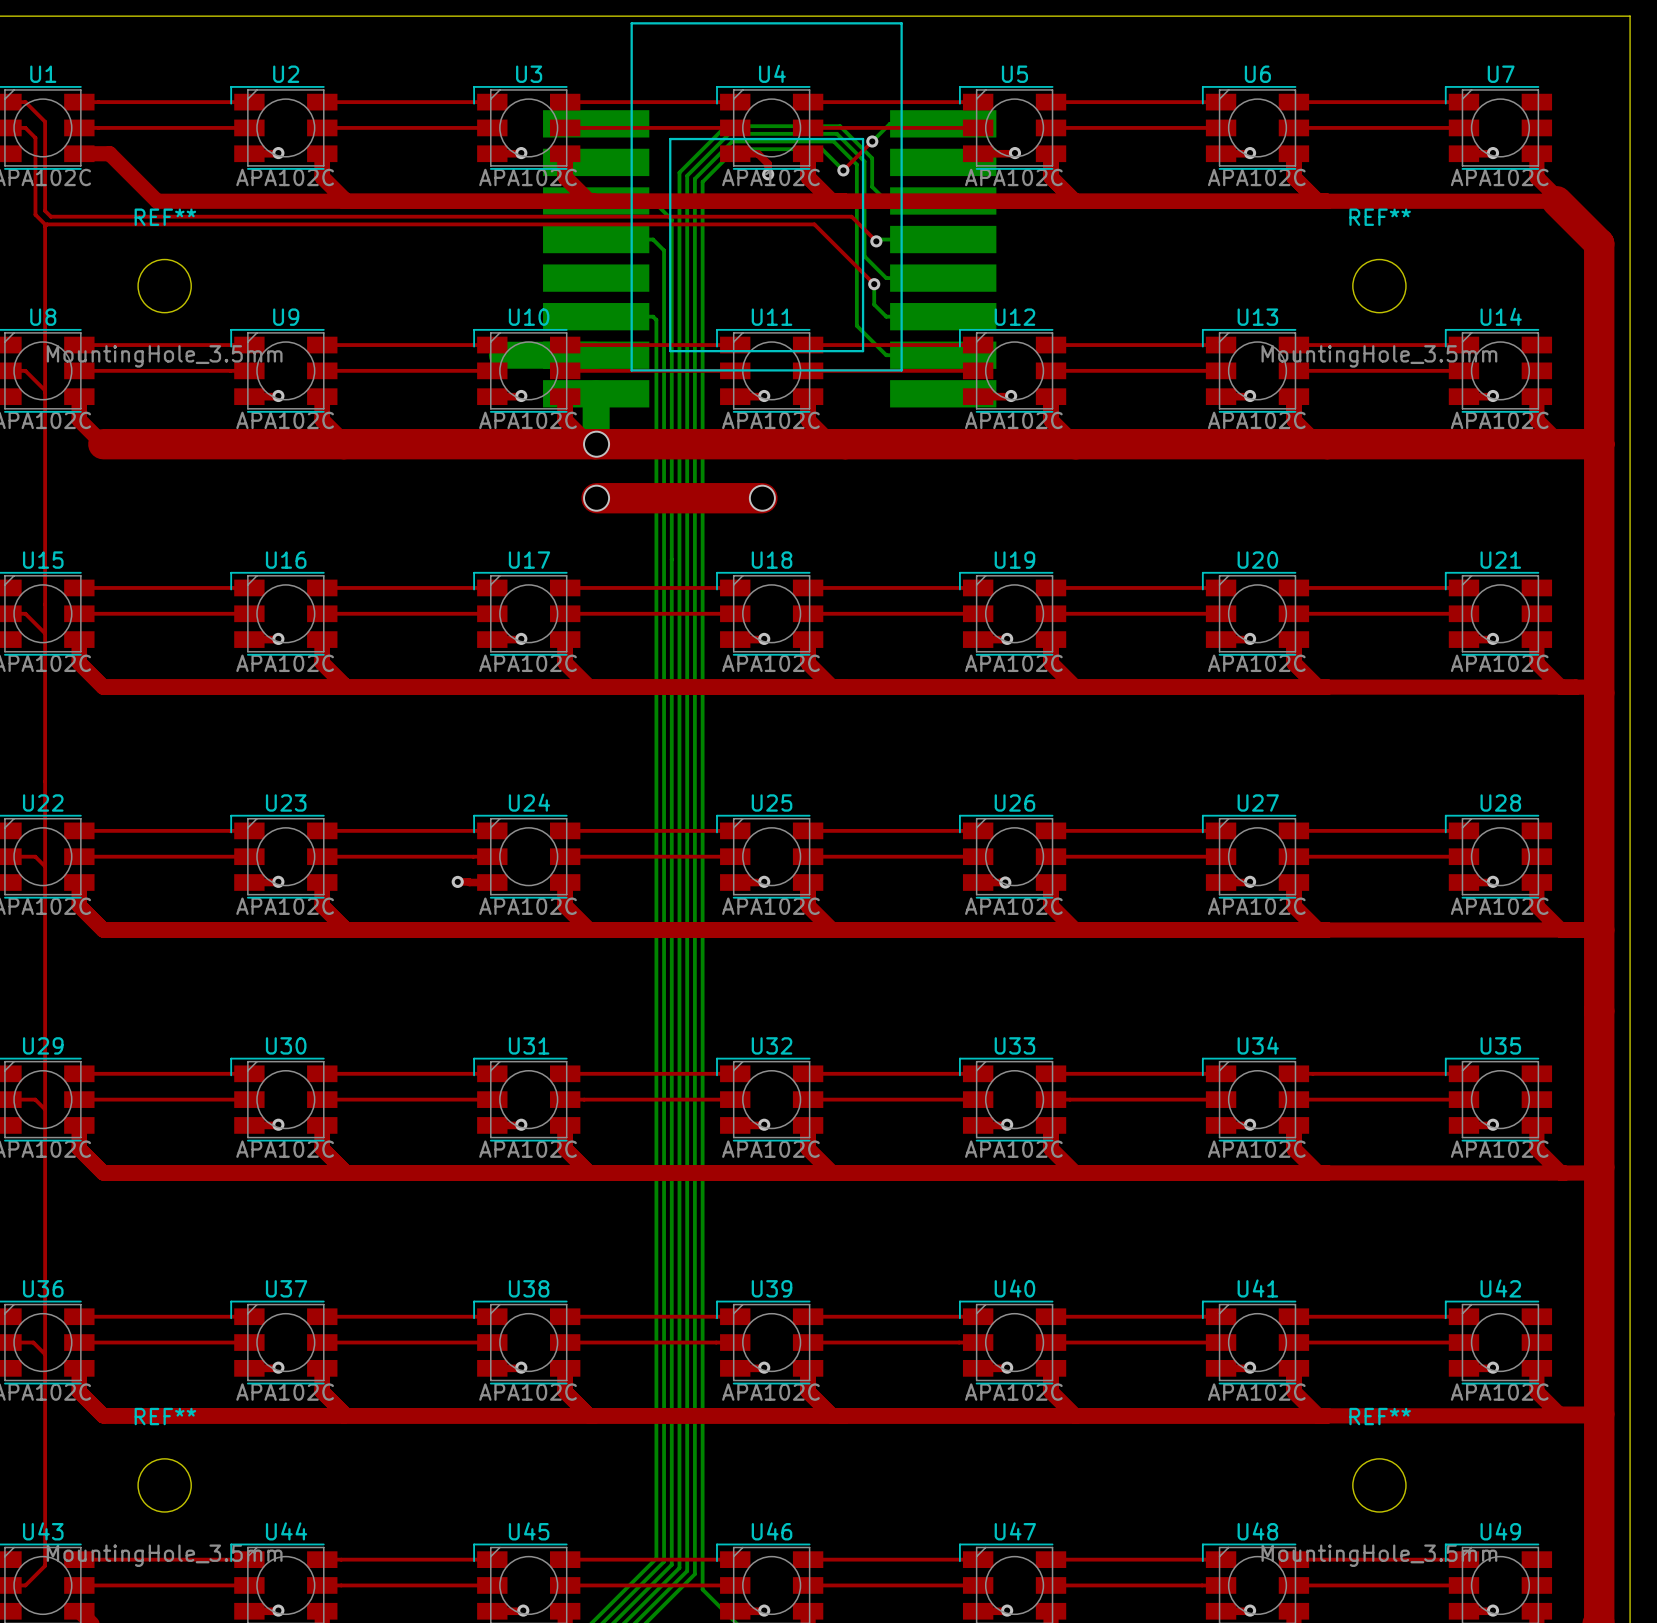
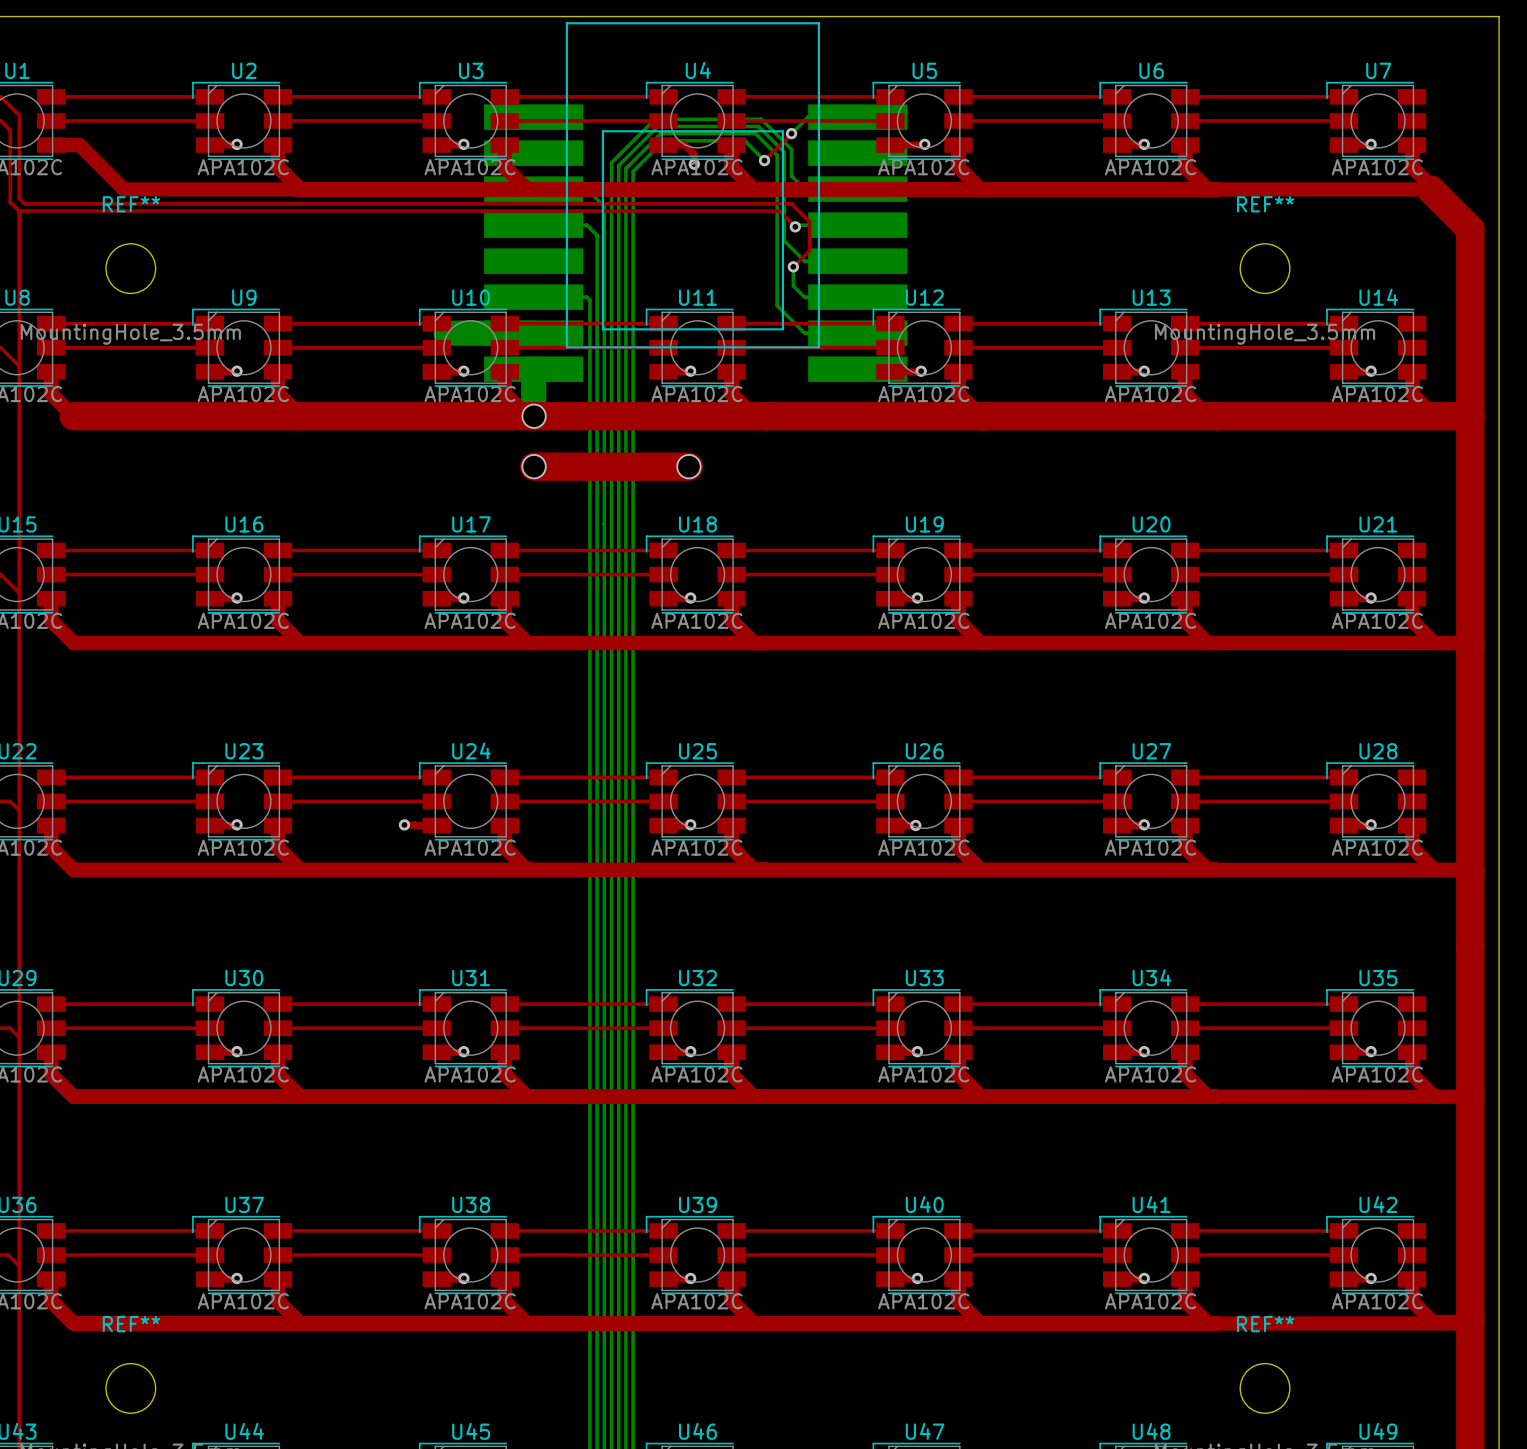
top track: (851, 216) (859, 224) -> (737, 211) (779, 211)
top track: (814, 224) (874, 284) -> (772, 203) (791, 203) (809, 221) (809, 250) (793, 266)

